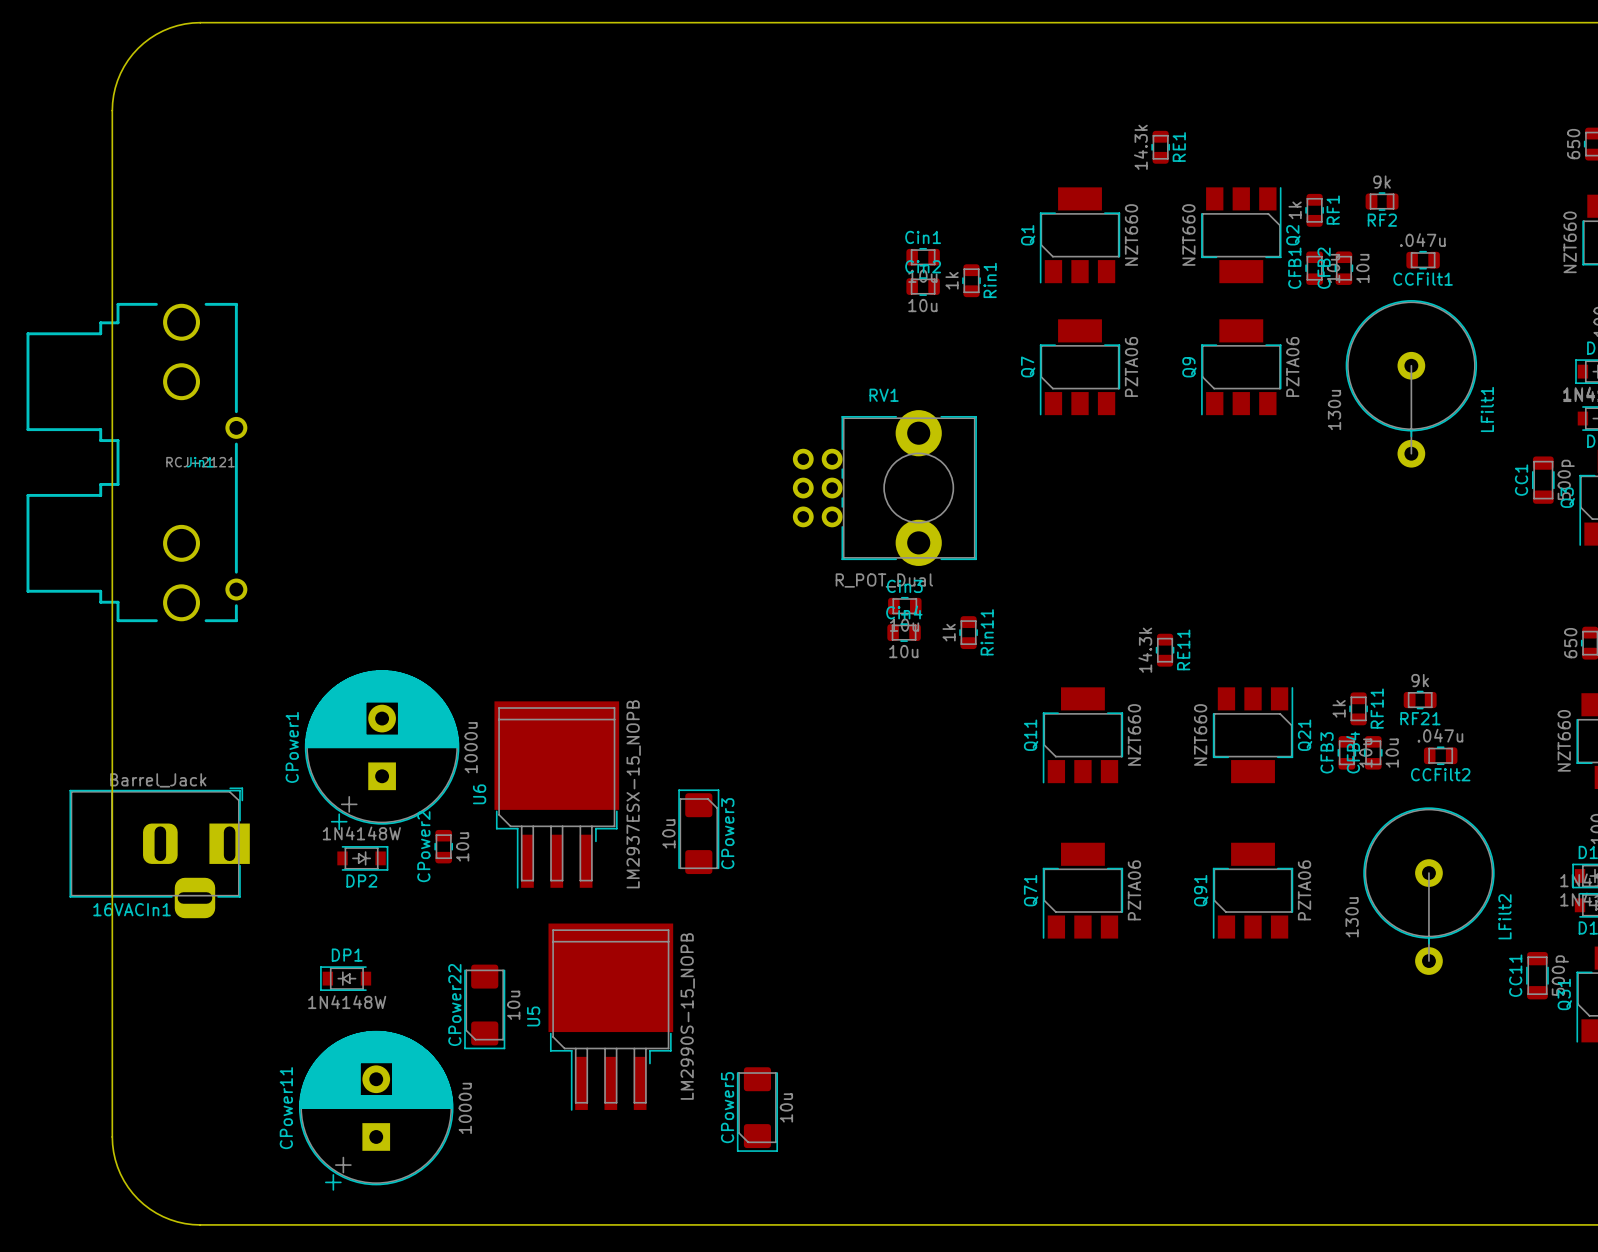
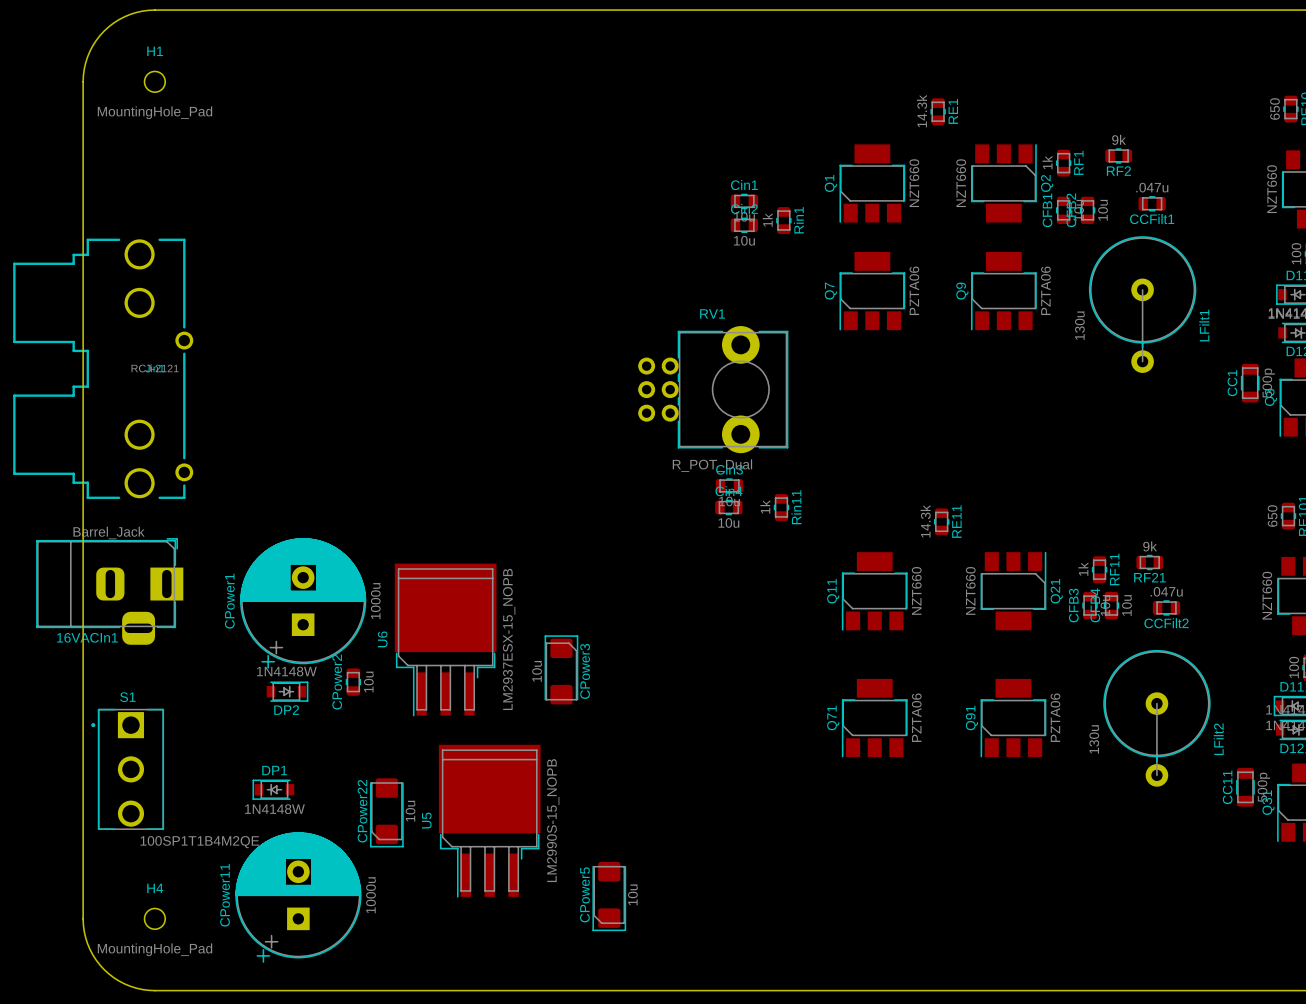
H1: none -> MountingHole_Pad (154, 81)
16VACIn1 position: (159, 852) -> (109, 591)
S1: none -> 100SP1T1B4M2QE (127, 769)
H4: none -> MountingHole_Pad (154, 918)

